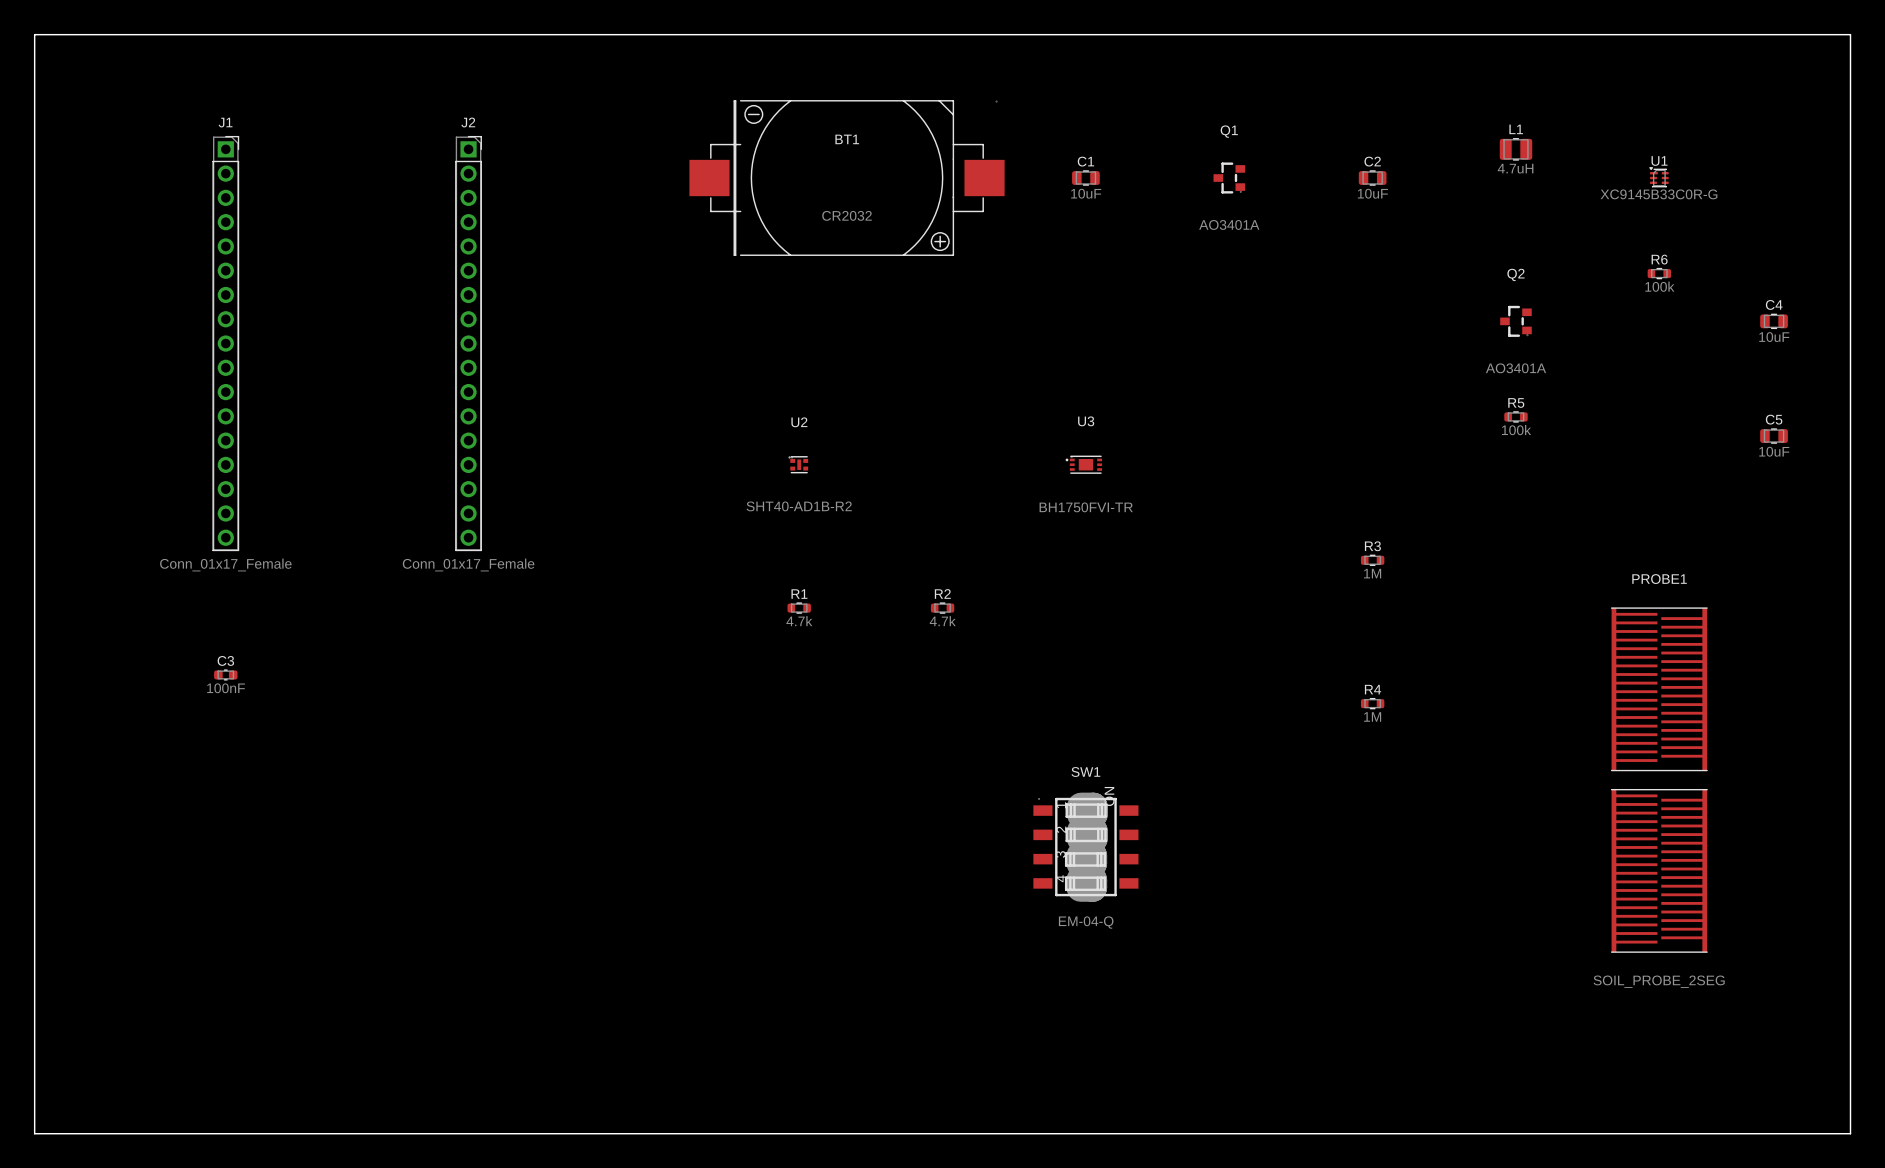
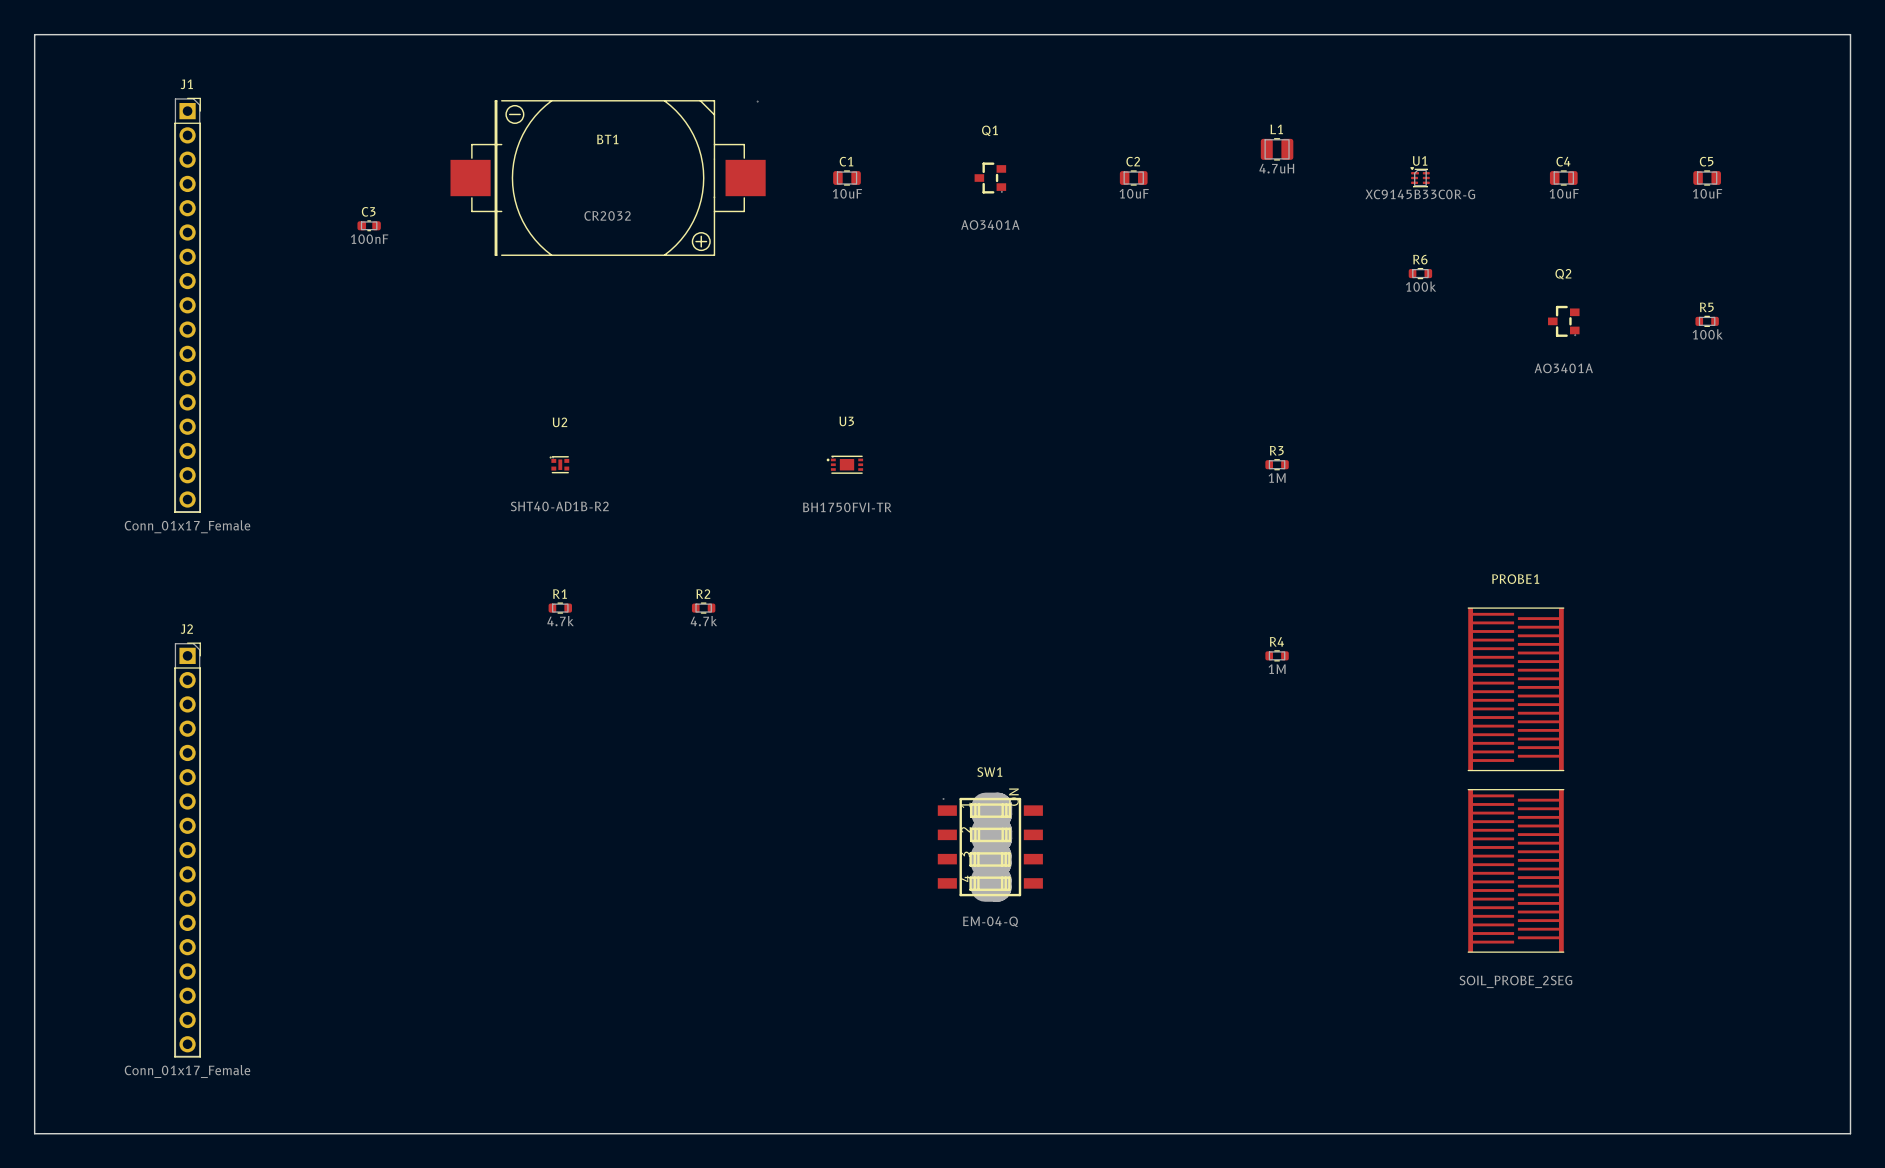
L1 position: (1515, 149) -> (1277, 149)
U1 position: (1658, 177) -> (1420, 177)
BT1 position: (847, 178) -> (608, 178)
C1 position: (1085, 178) -> (847, 178)
Q1 position: (1229, 178) -> (990, 178)
C2 position: (1372, 178) -> (1133, 178)
R6 position: (1659, 273) -> (1420, 273)
Q2 position: (1515, 321) -> (1563, 321)
C4 position: (1774, 321) -> (1563, 178)
J1 position: (225, 343) -> (187, 305)
J2 position: (468, 343) -> (187, 850)
R5 position: (1515, 416) -> (1707, 321)
C5 position: (1774, 436) -> (1707, 178)
U2 position: (798, 464) -> (559, 464)
U3 position: (1083, 464) -> (844, 464)
R3 position: (1372, 560) -> (1277, 464)
R1 position: (799, 608) -> (560, 608)
R2 position: (942, 608) -> (703, 608)
C3 position: (225, 674) -> (369, 225)
R4 position: (1372, 703) -> (1277, 655)
PROBE1 position: (1659, 780) -> (1515, 780)
SW1 position: (1085, 847) -> (990, 847)

